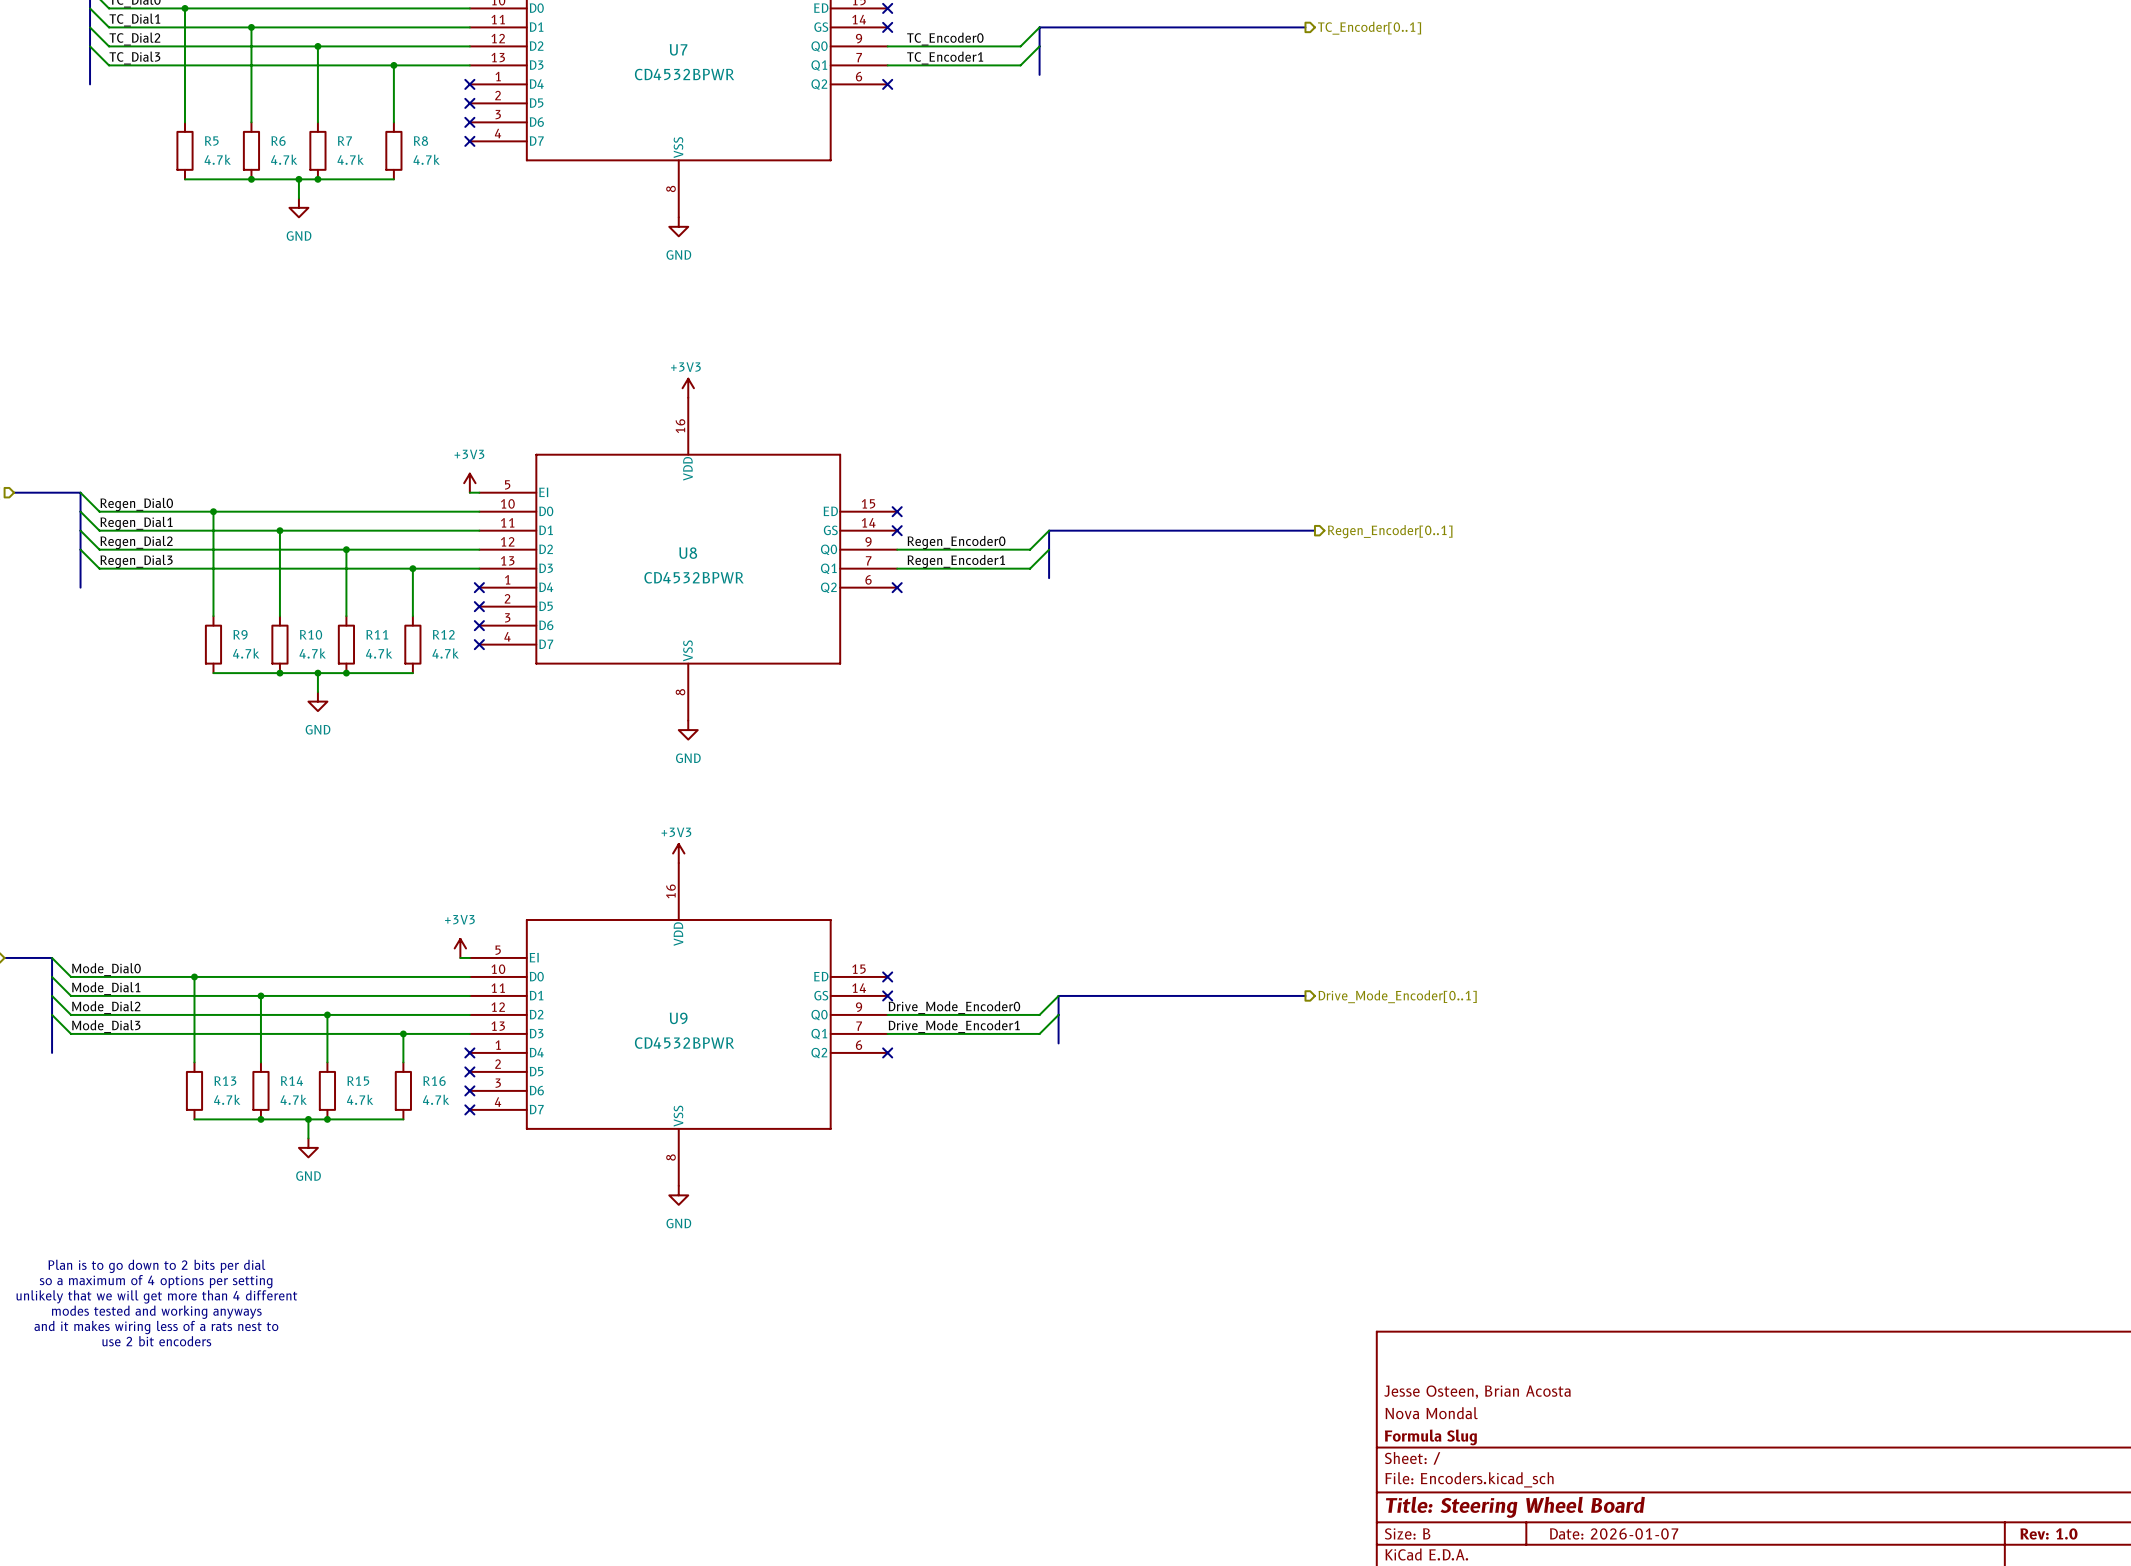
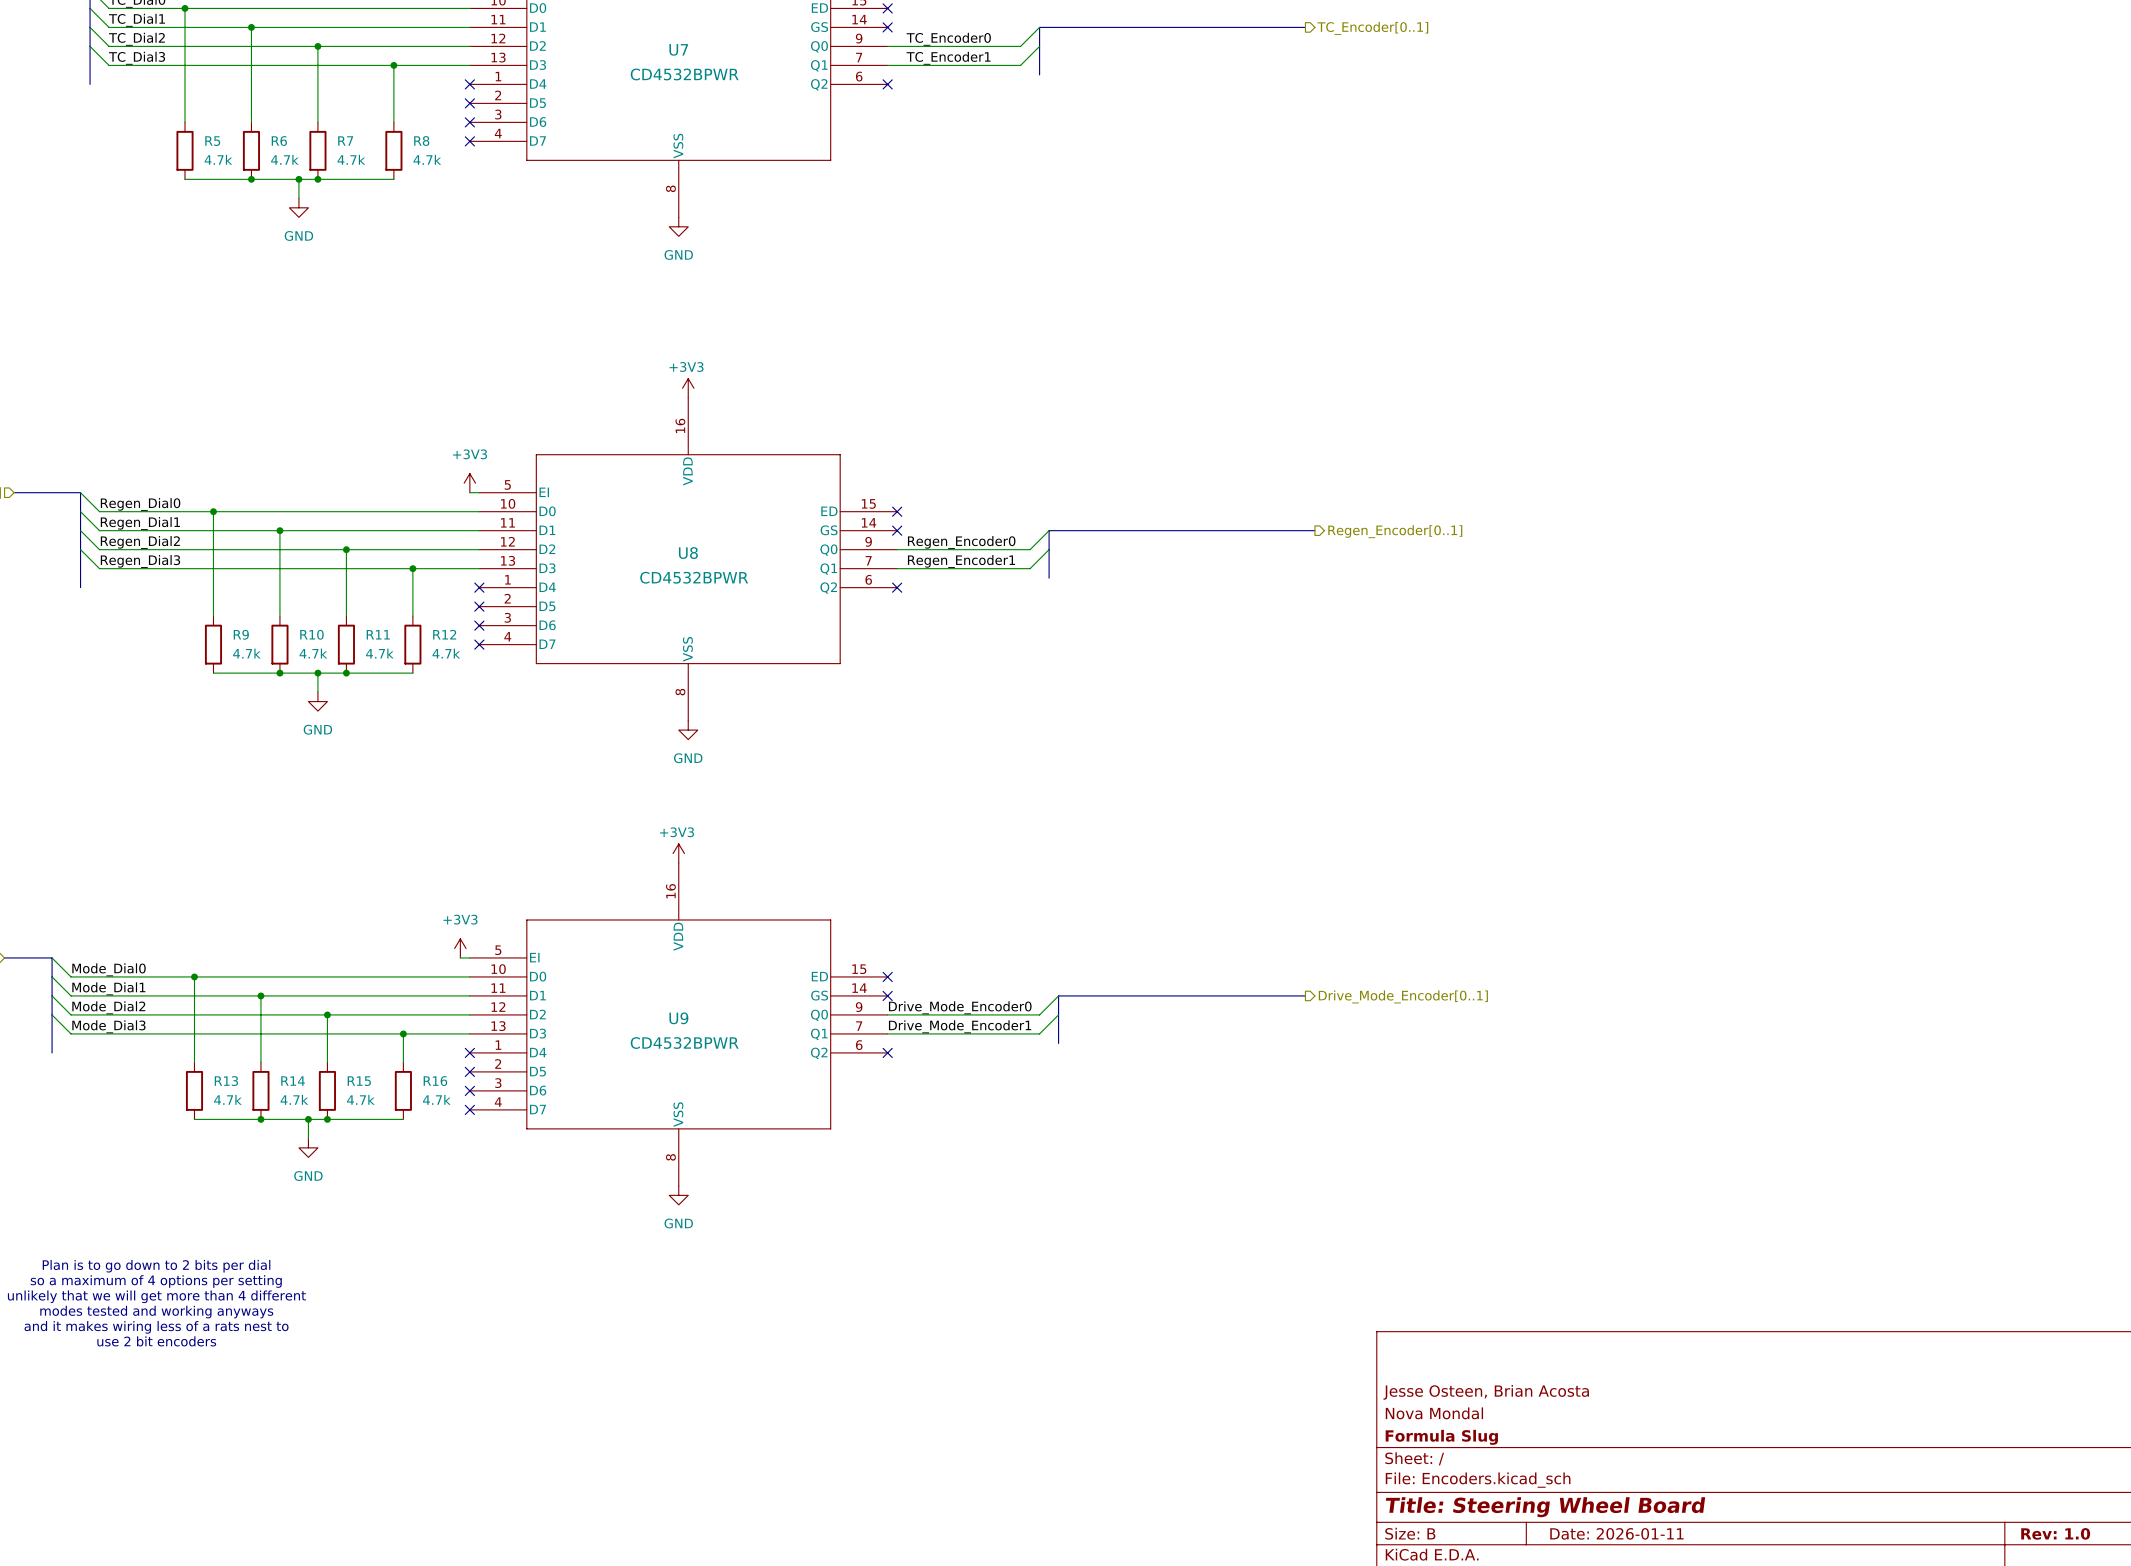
title block: Date: 2026-01-07 (1614, 1533) -> Date: 2026-01-11 (1616, 1533)

